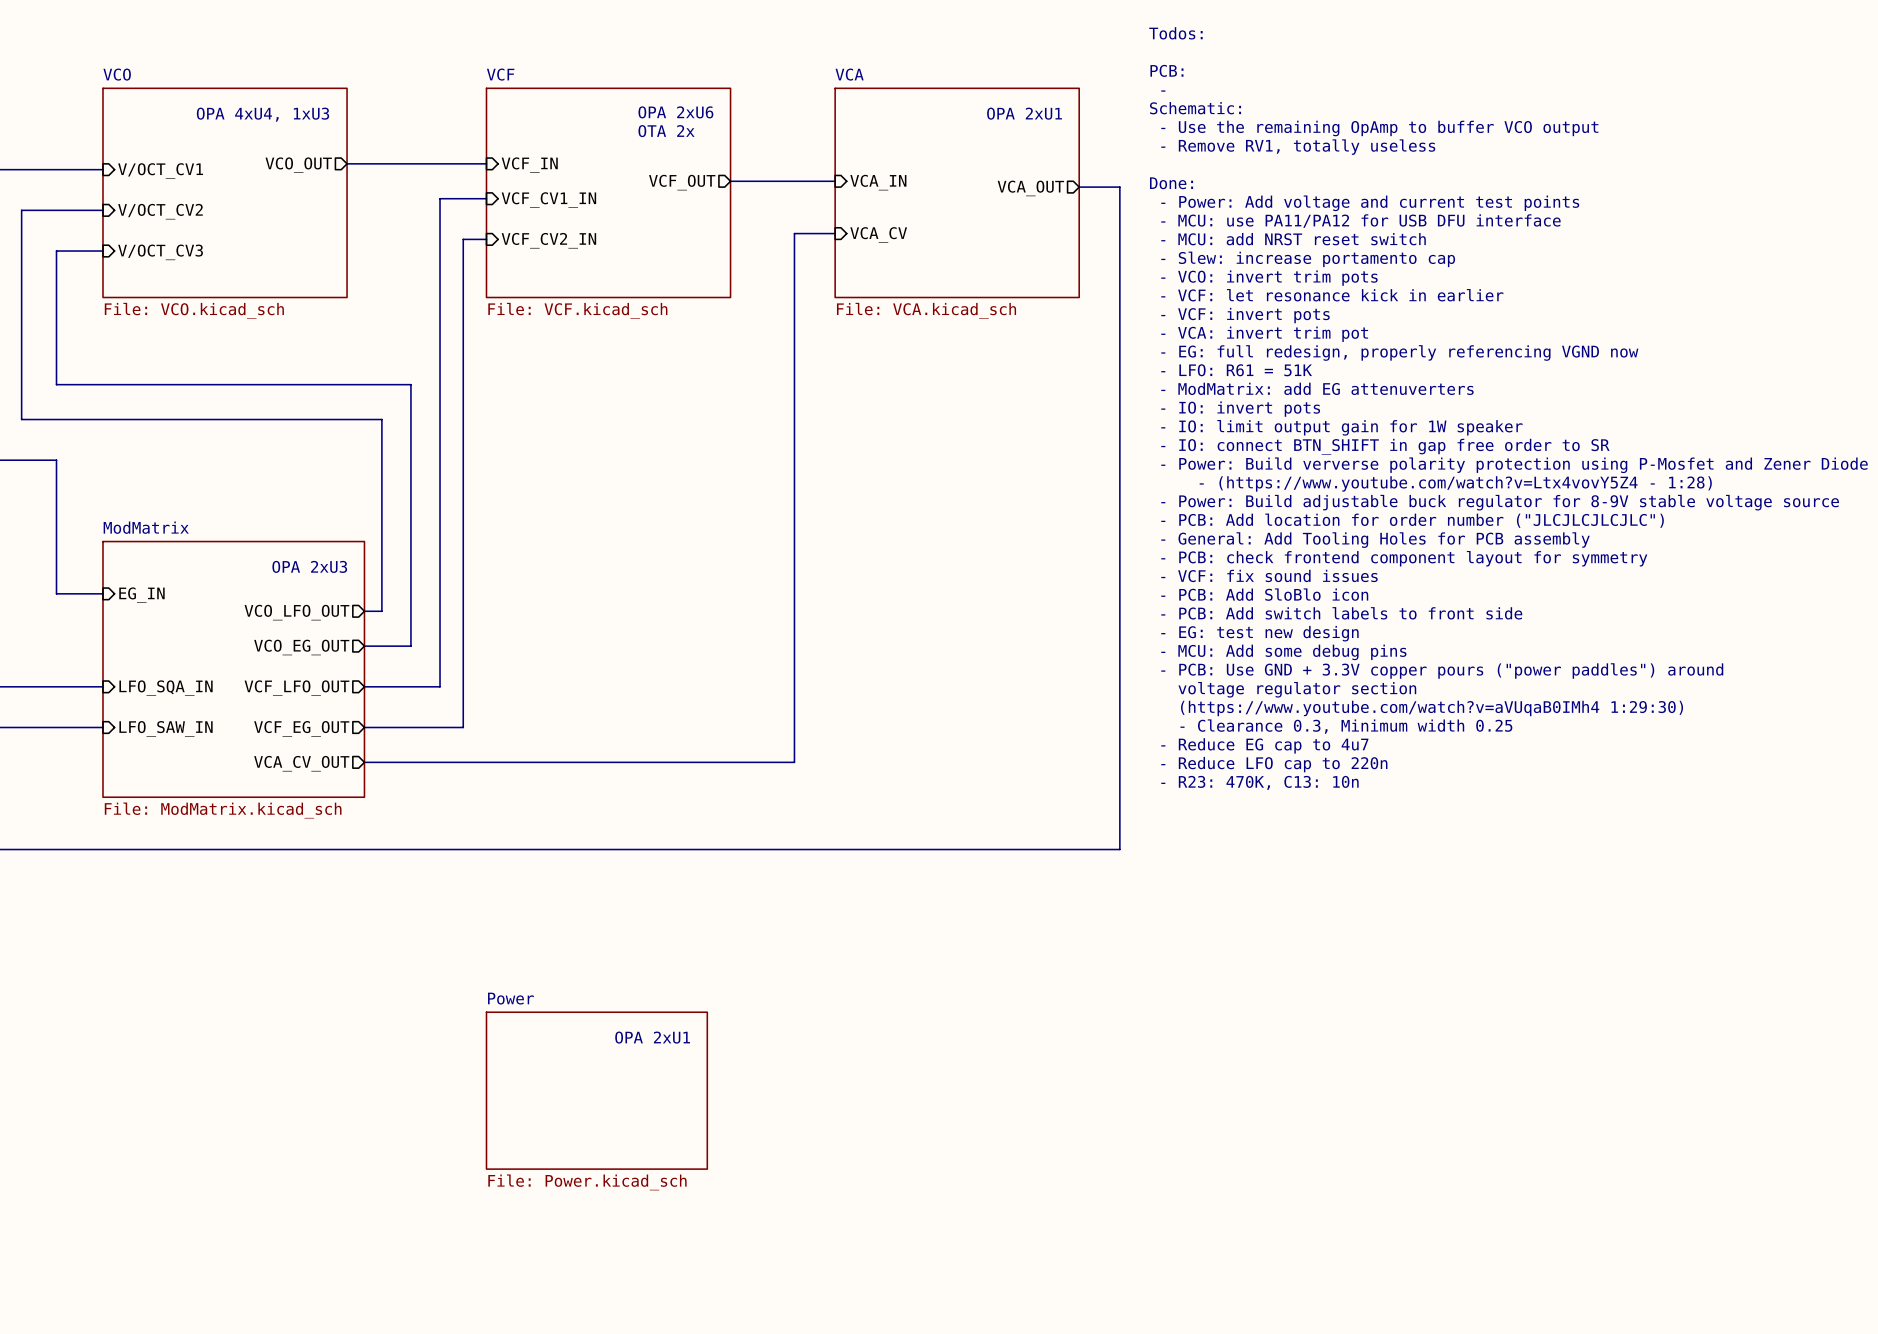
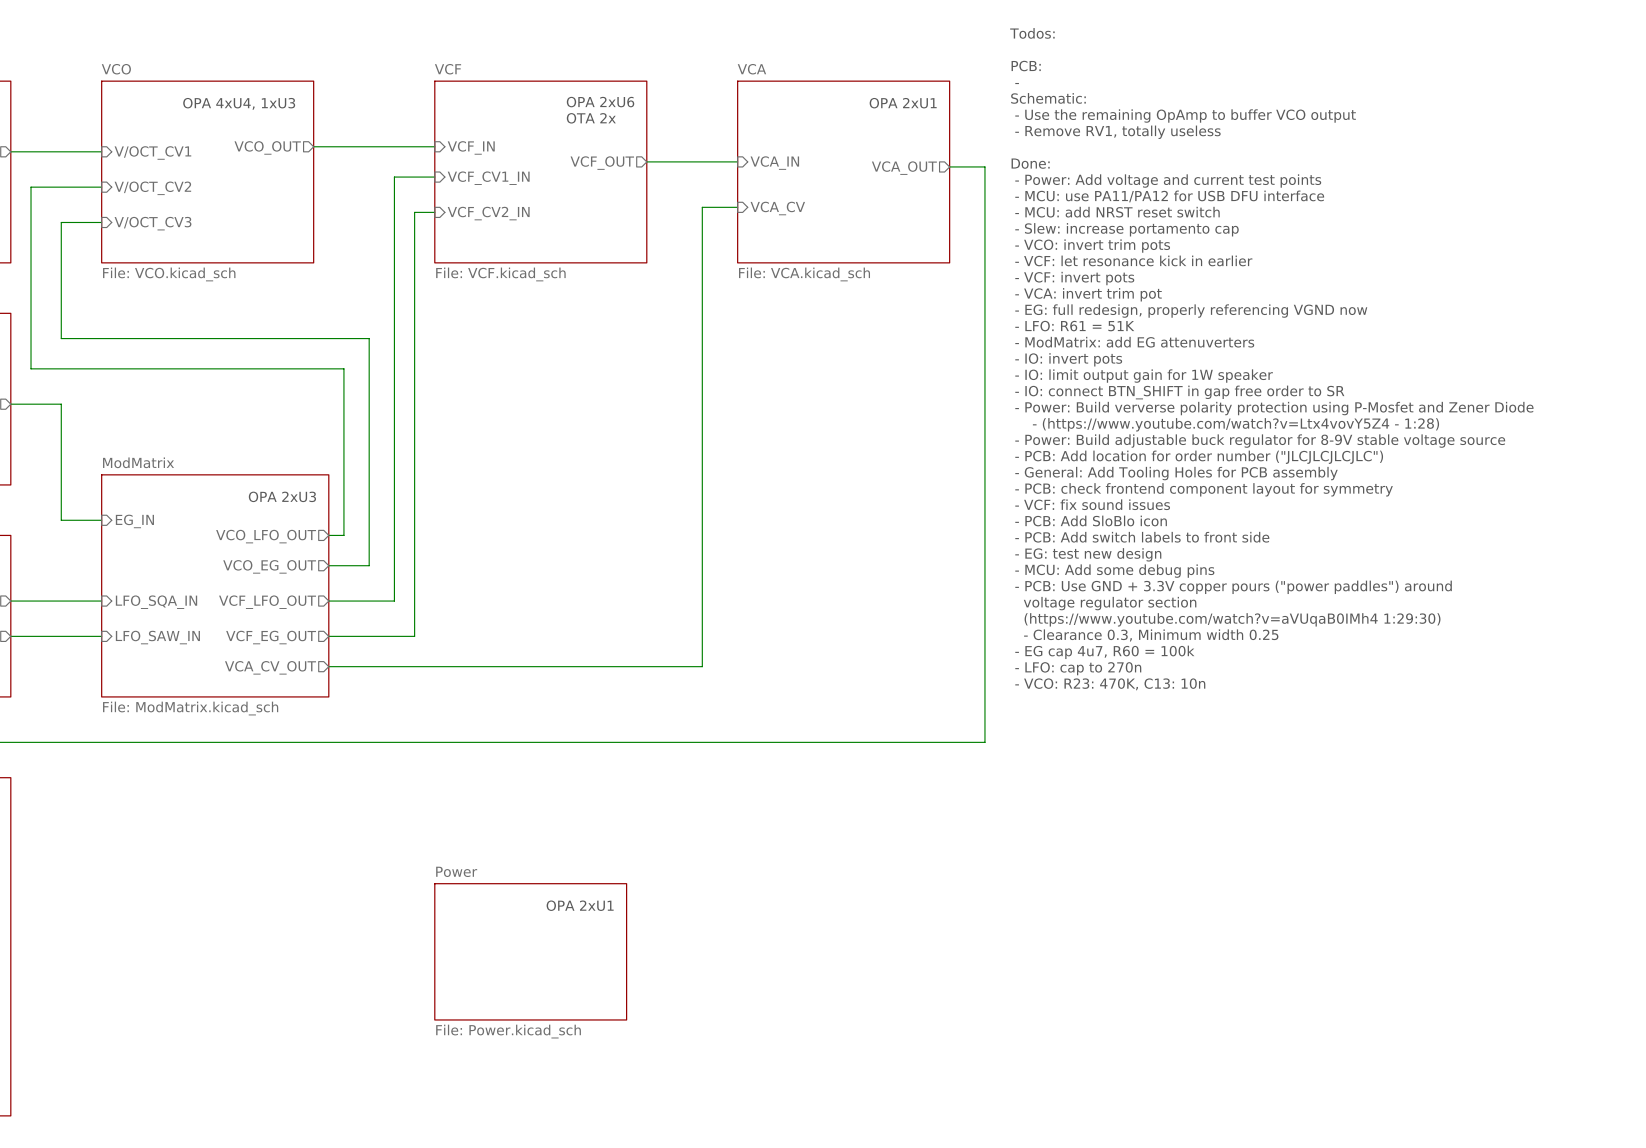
text: - Reduce EG cap to 4u7 (1264, 745) -> - EG cap 4u7, R60 = 100k (1104, 652)
text: - Reduce LFO cap to 220n (1274, 764) -> - LFO: cap to 270n (1078, 668)
text: - R23: 470K, C13: 10n (1259, 782) -> - VCO: R23: 470K, C13: 10n (1110, 684)

